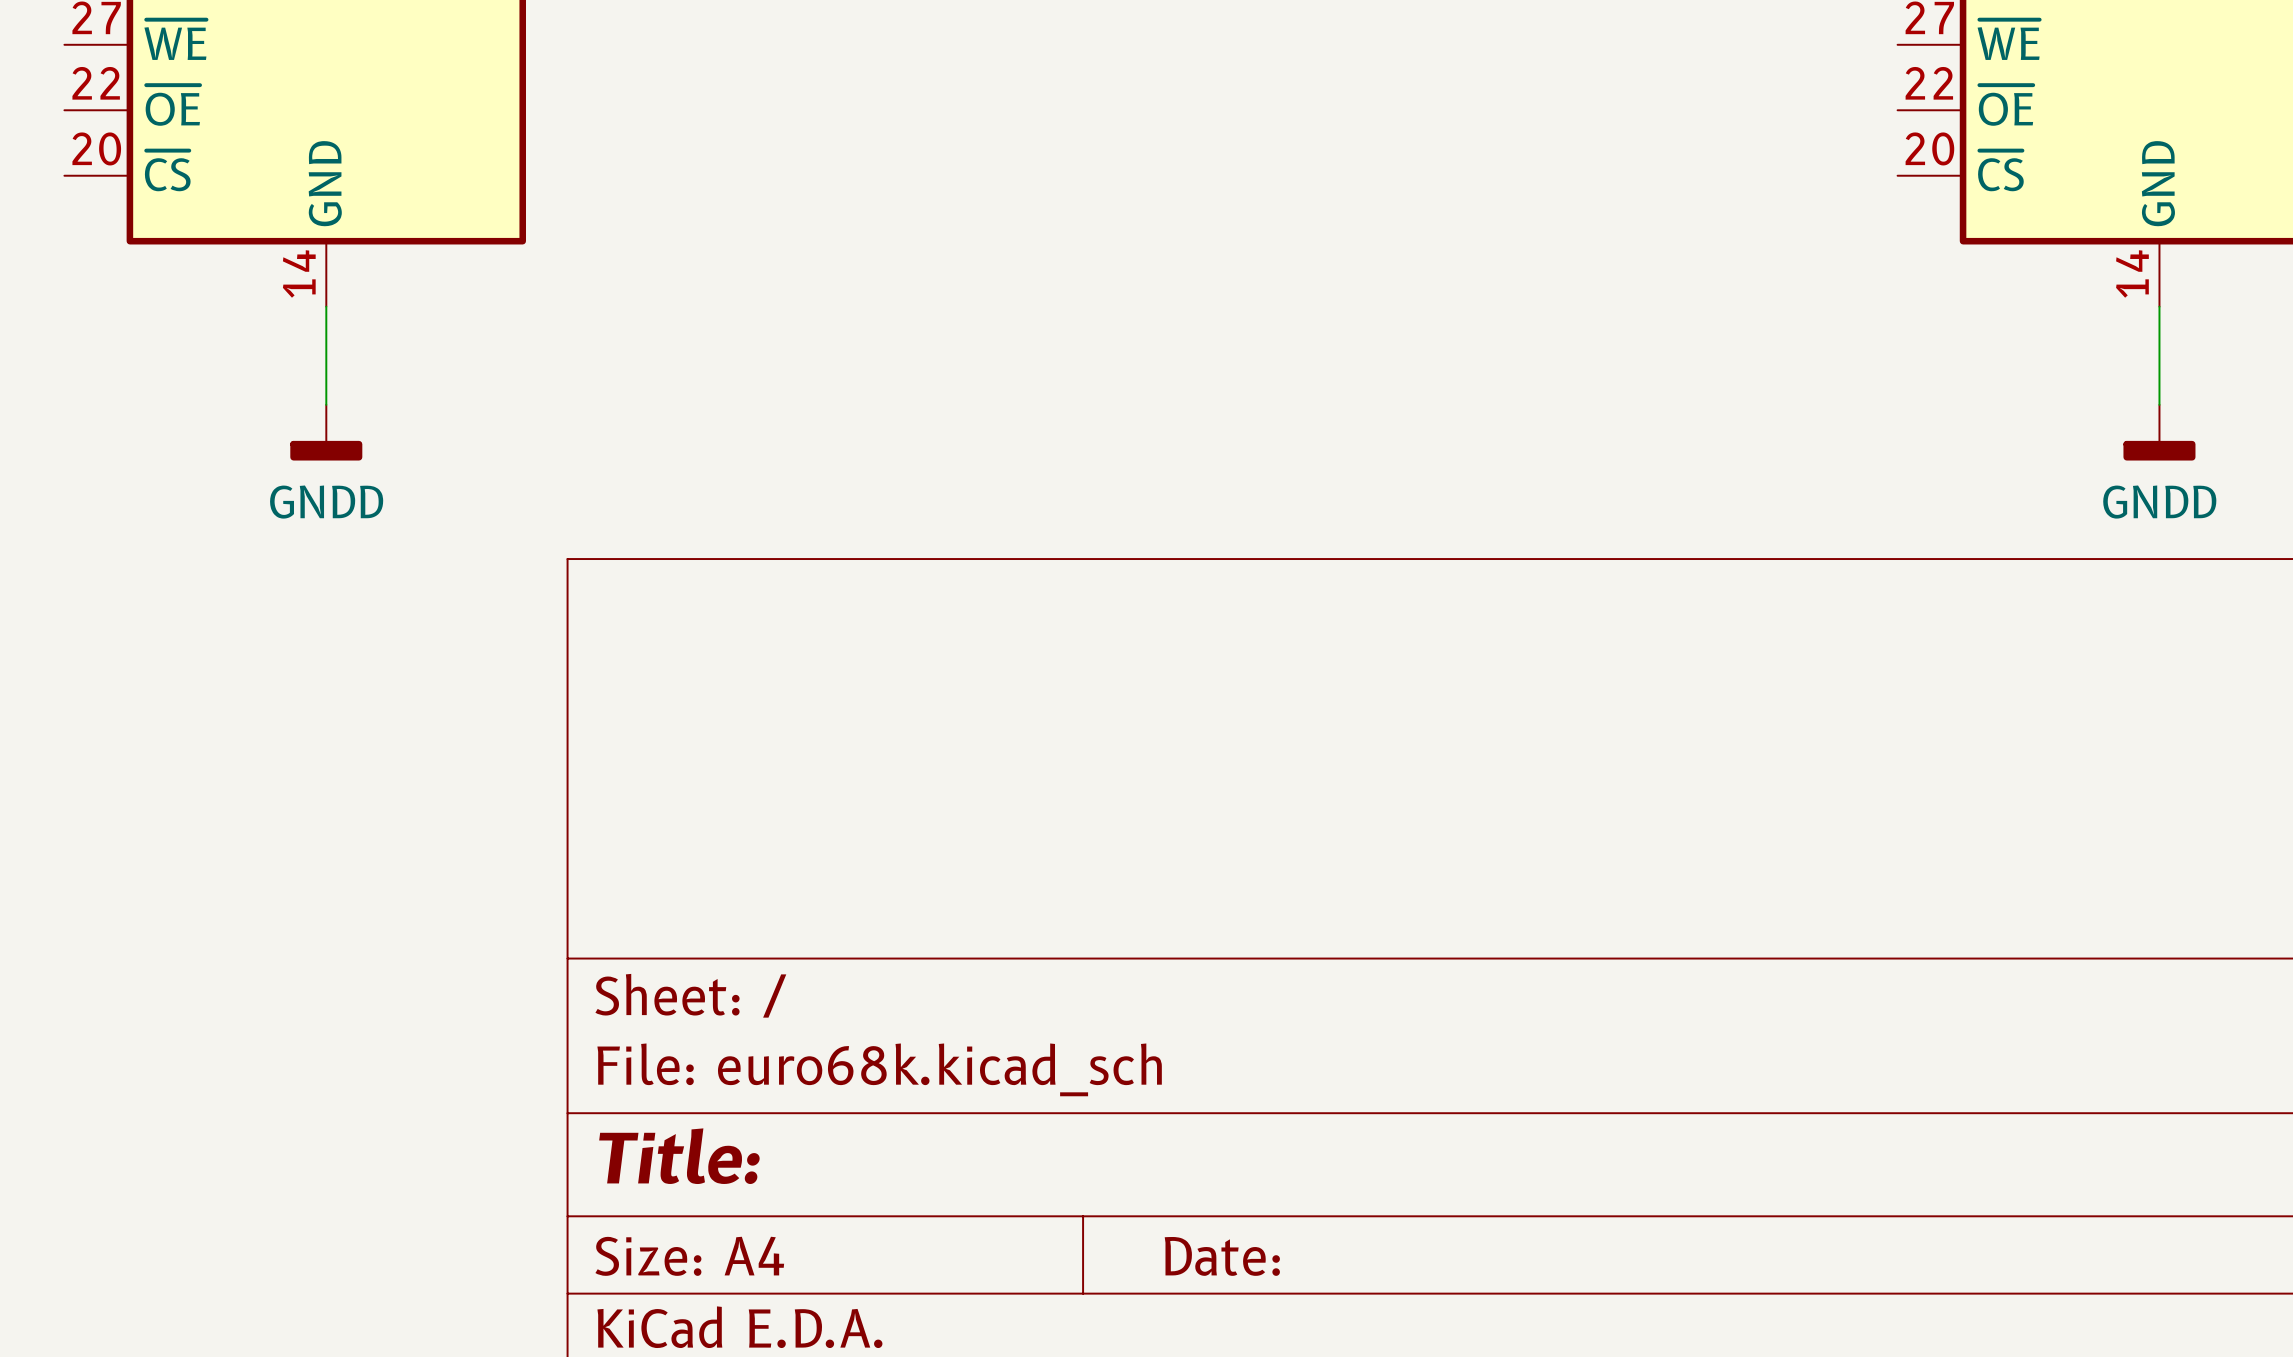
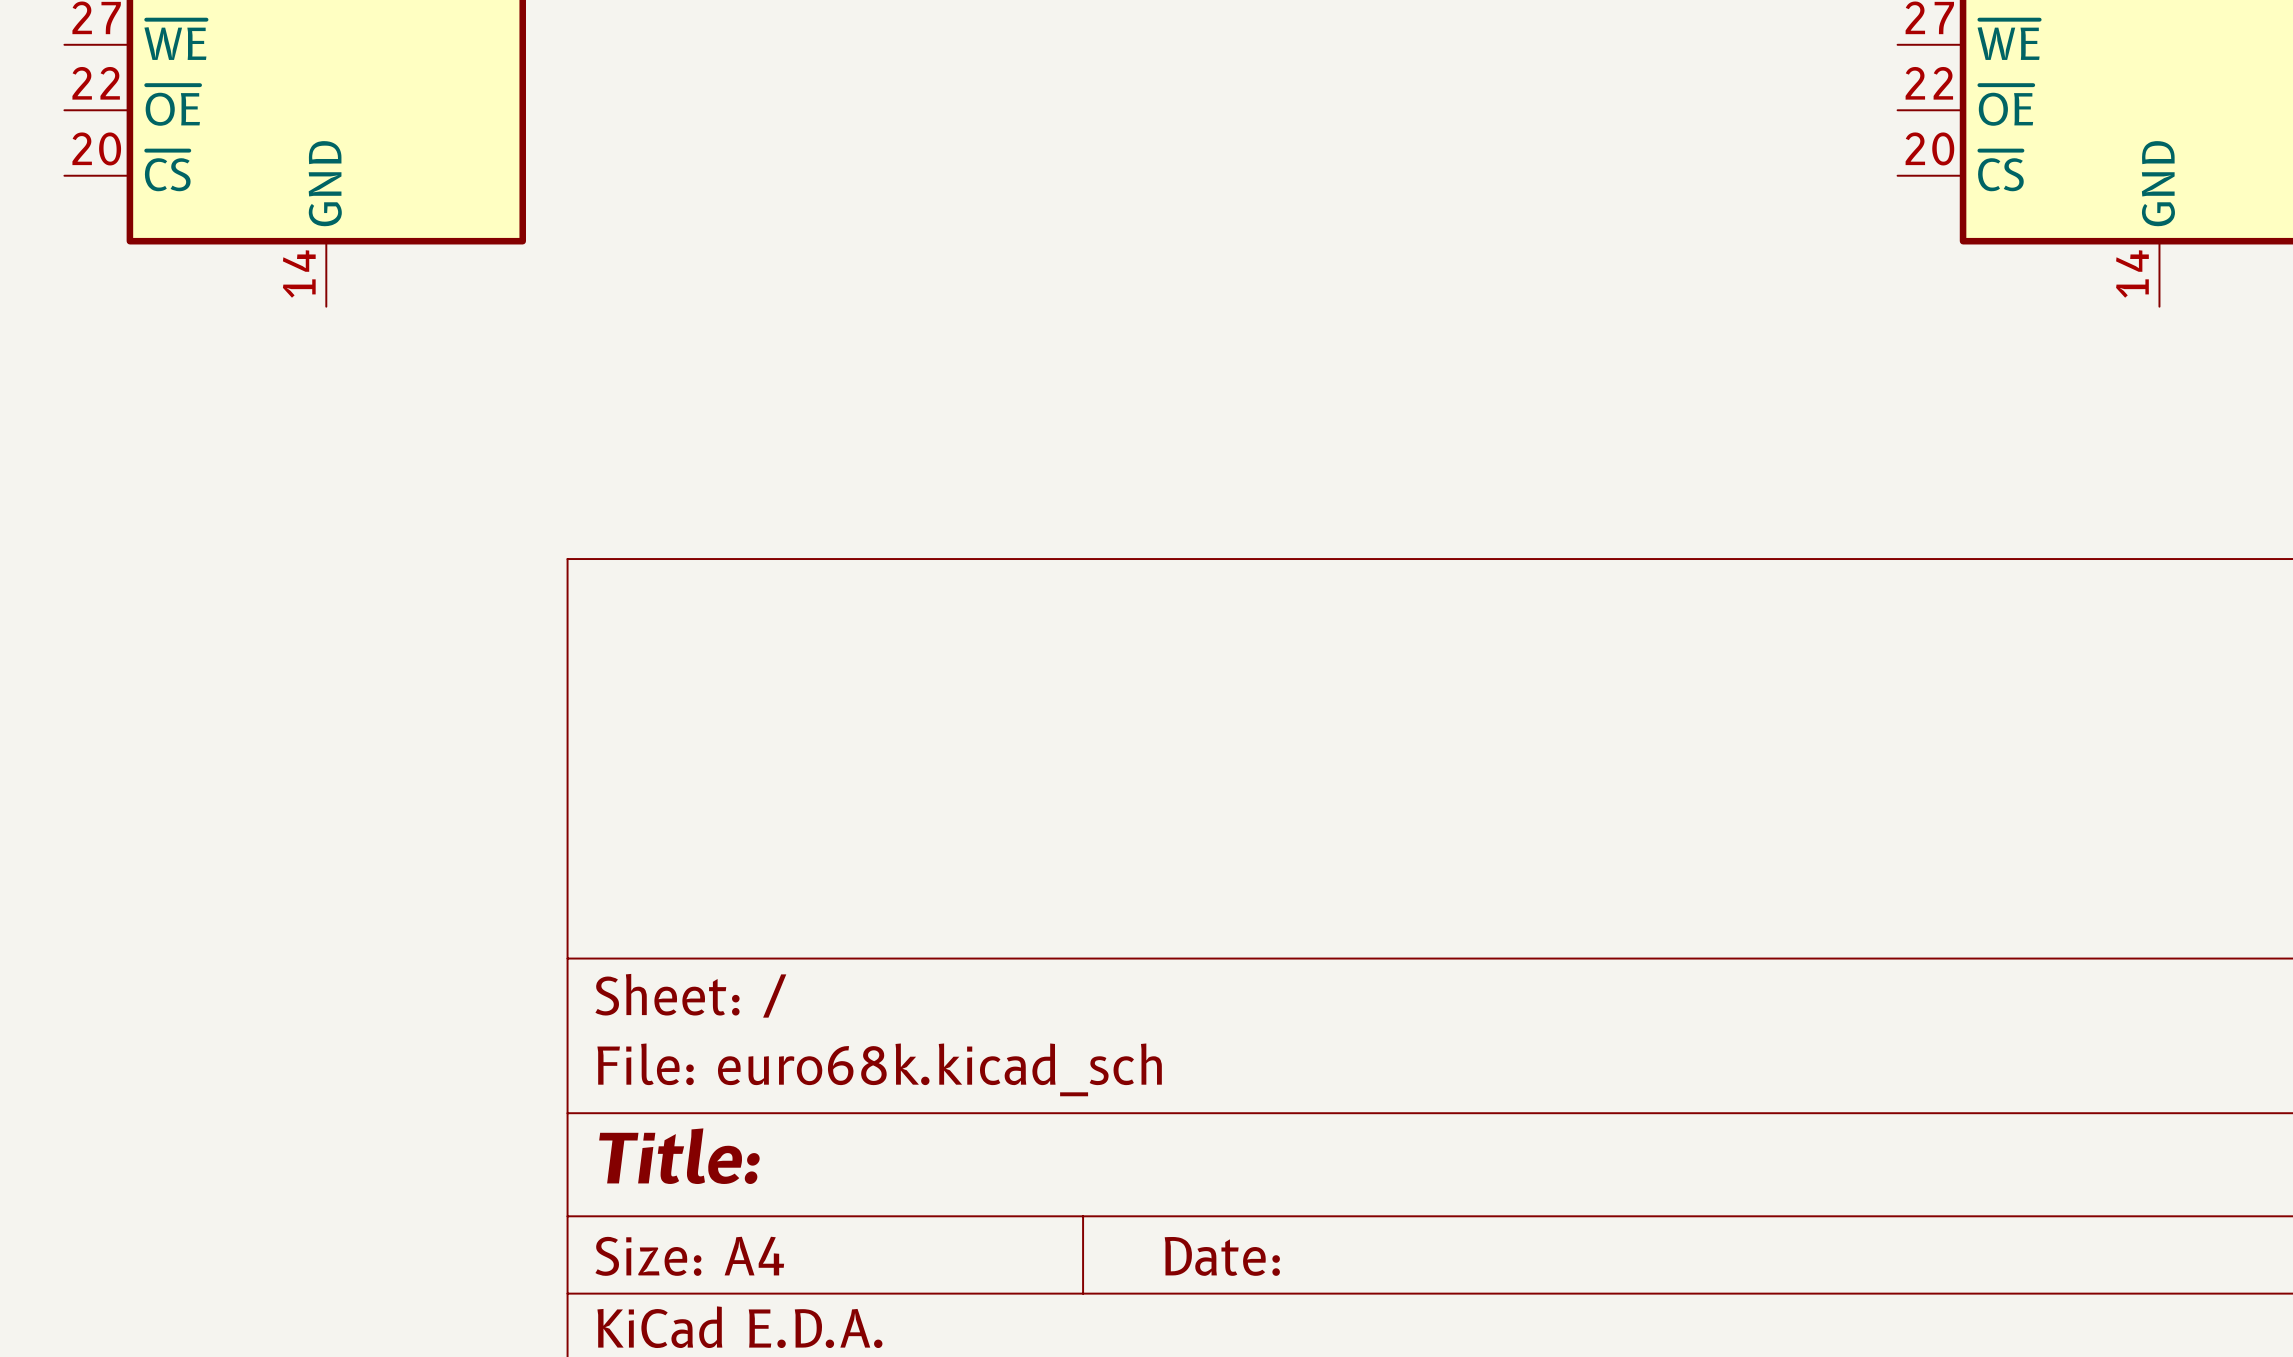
wire: (326, 306) (326, 404) -> none
wire: (2159, 306) (2159, 404) -> none
power symbol: GNDD (326, 432) -> none
power symbol: GNDD (2159, 432) -> none

